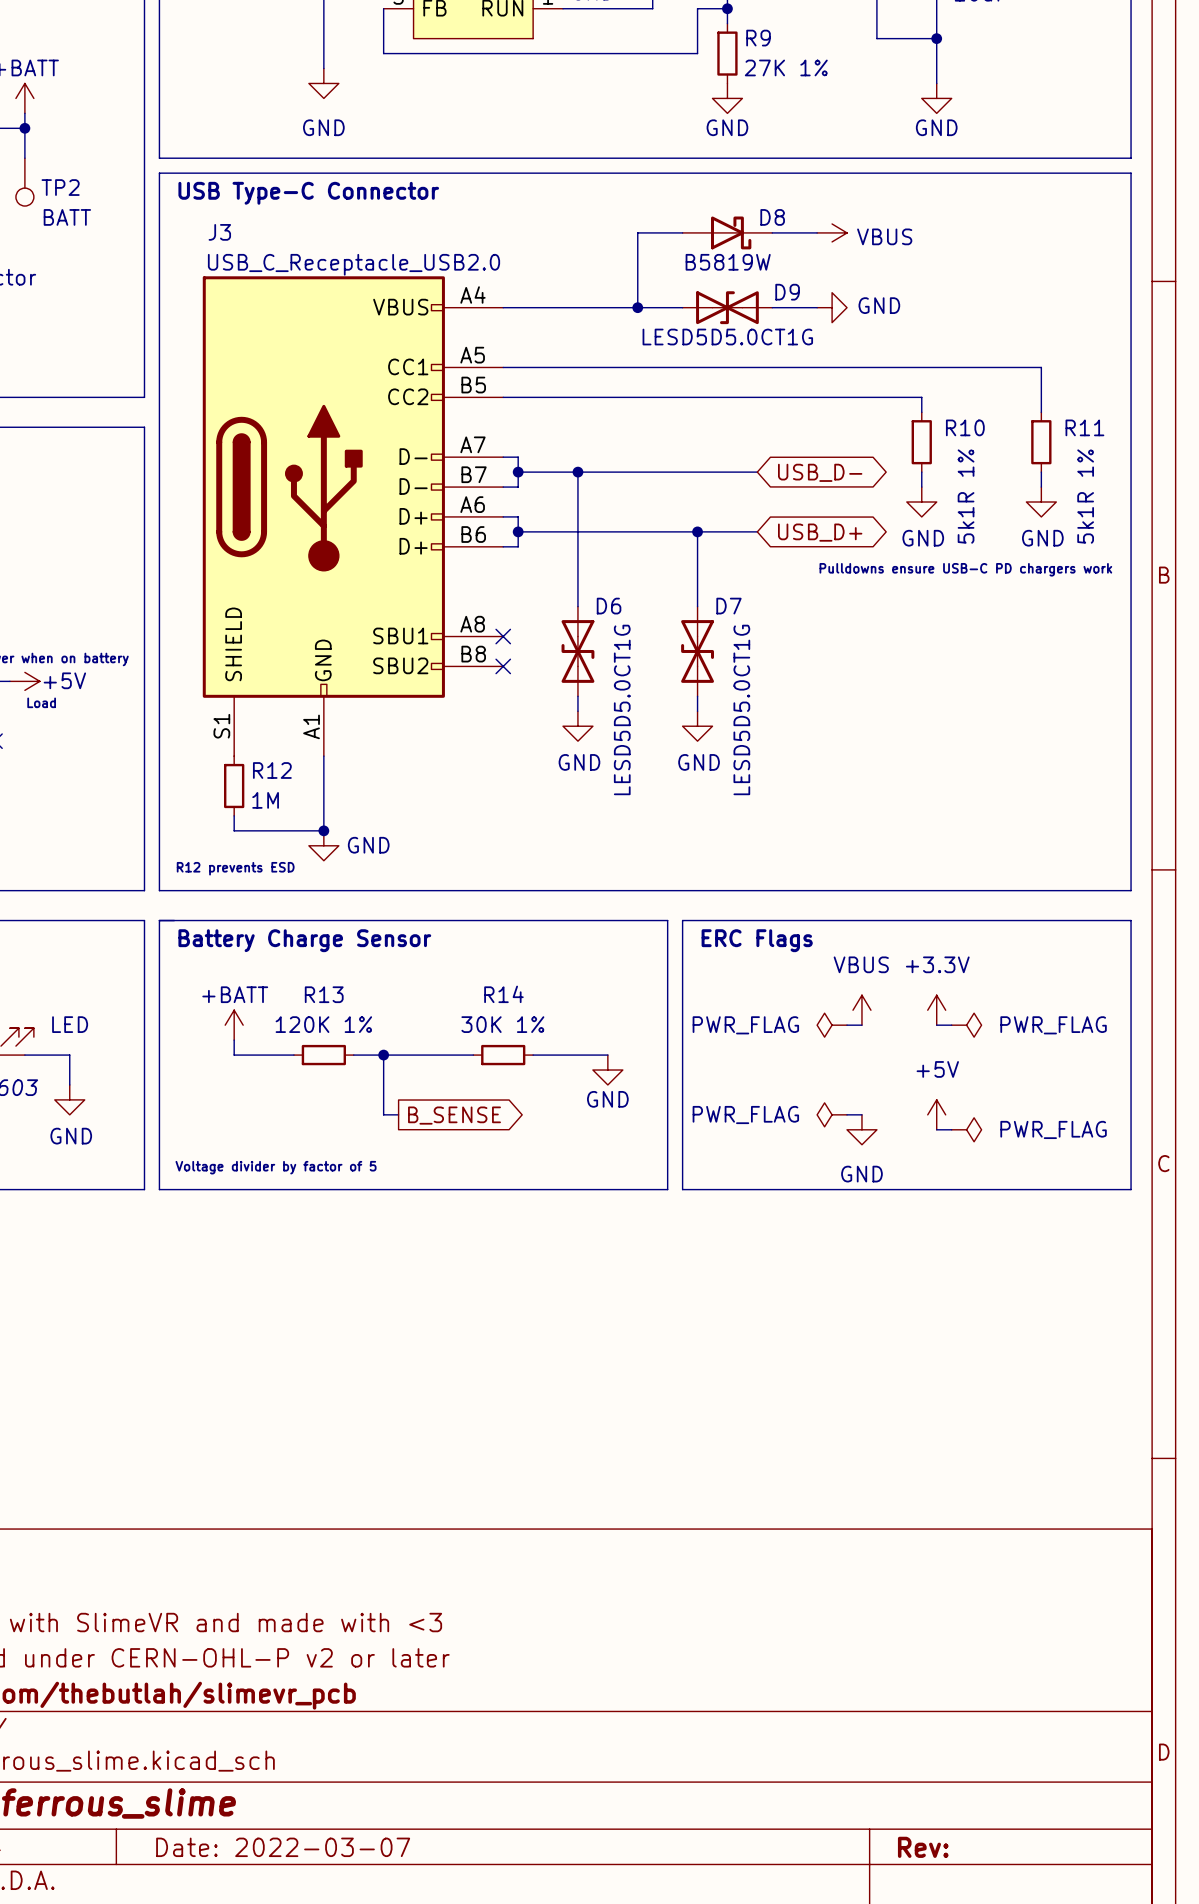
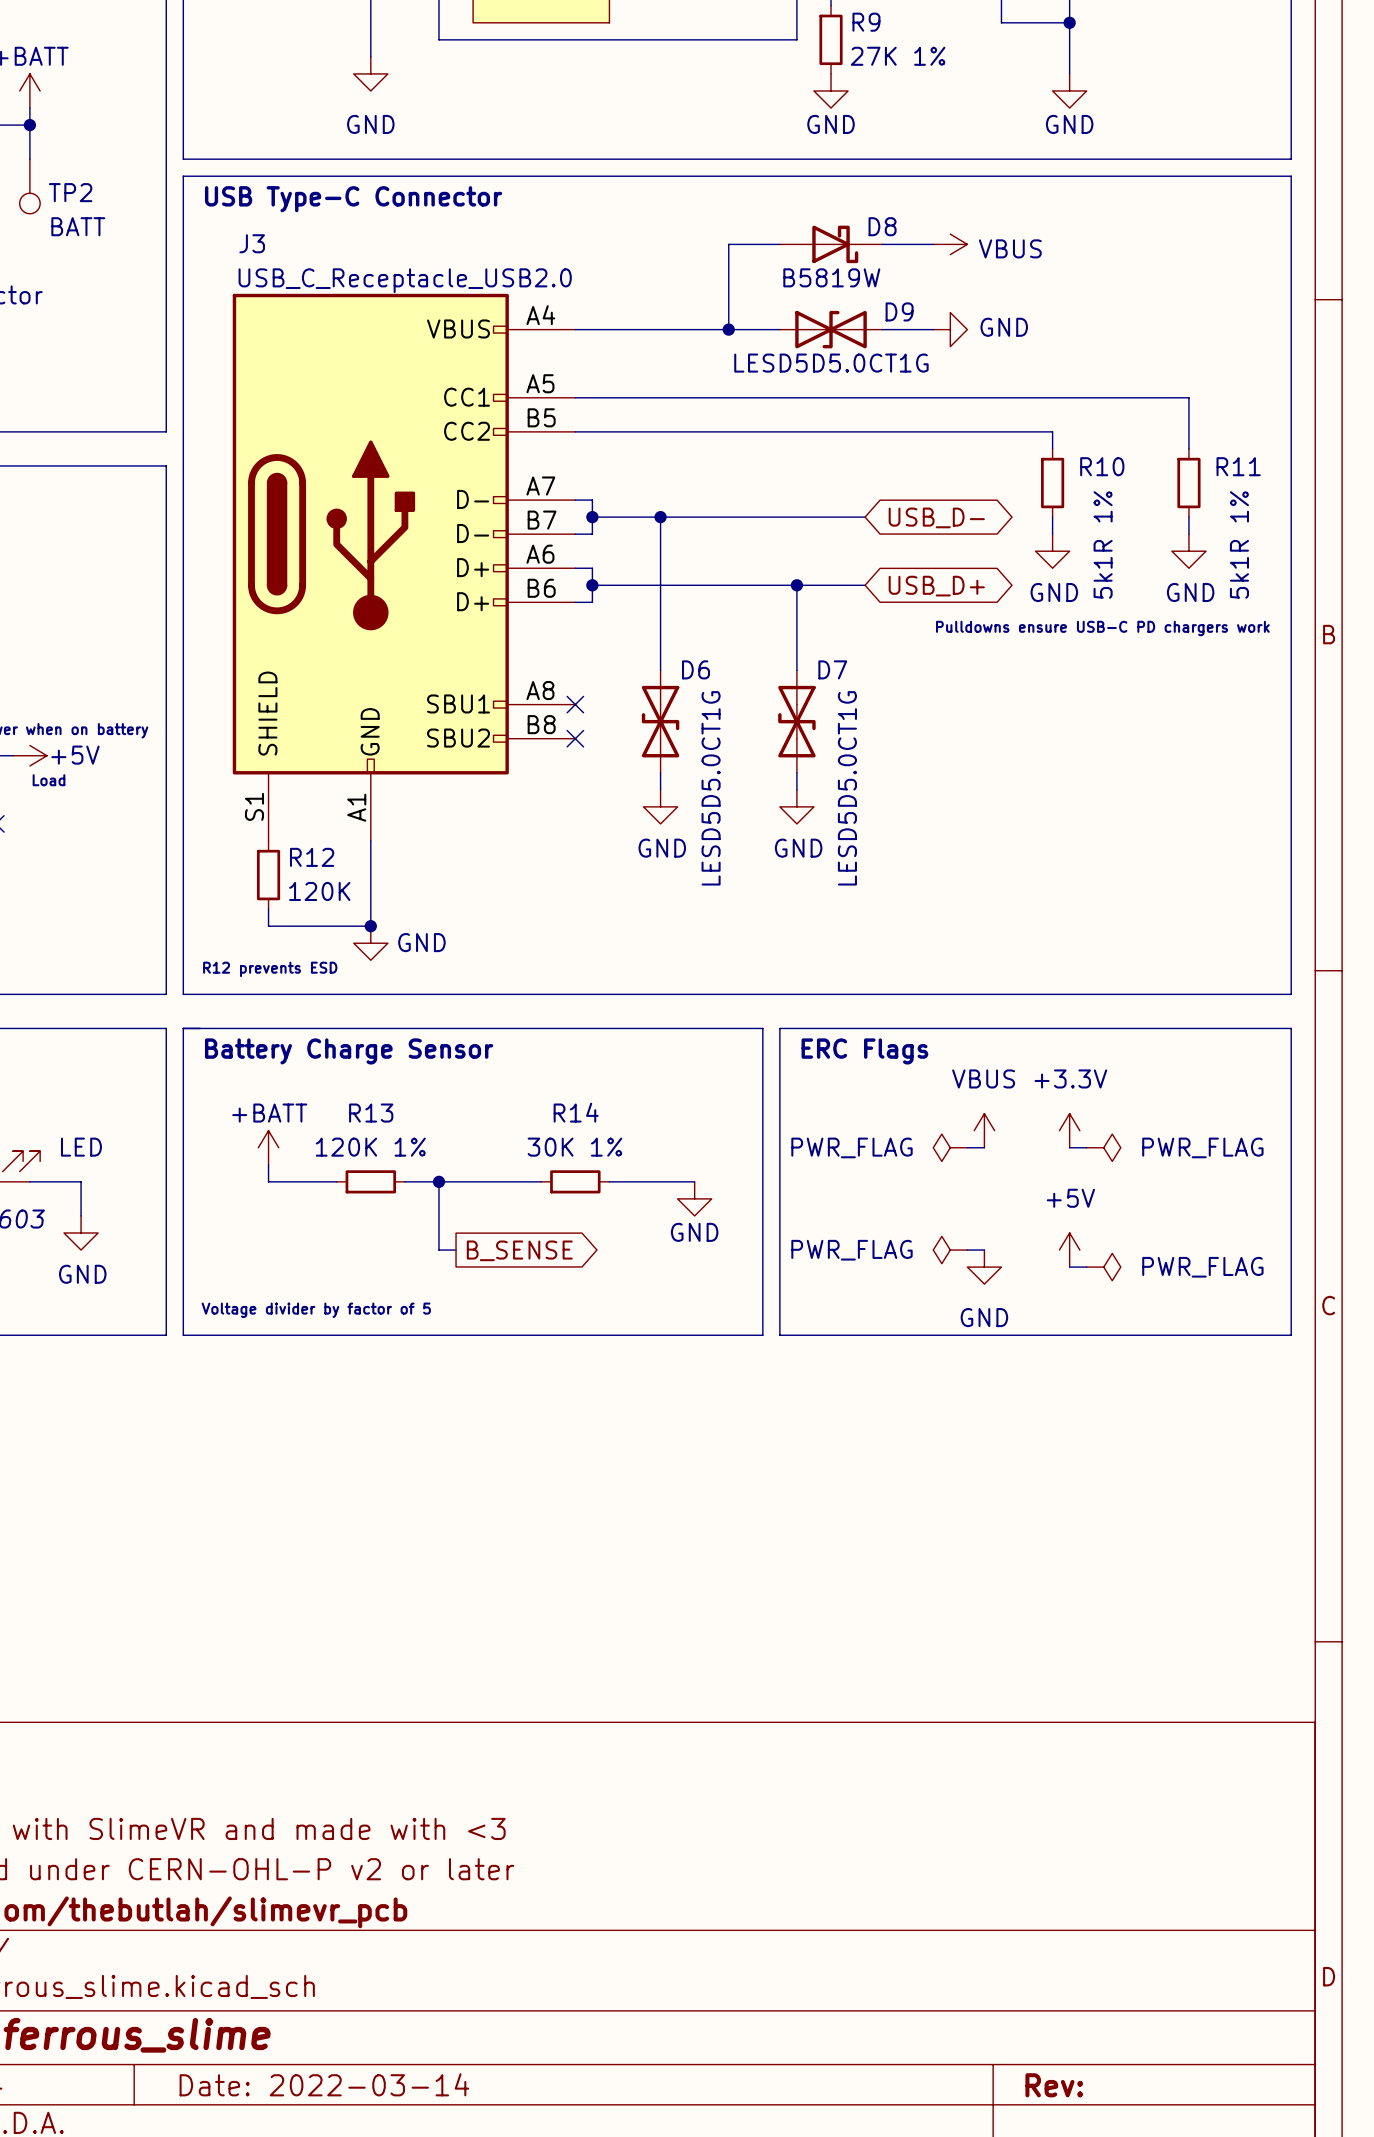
R12 value: 1M (265, 800) -> 120K (319, 891)
title block: Date: 2022-03-07 (283, 1847) -> Date: 2022-03-14 (324, 2084)

